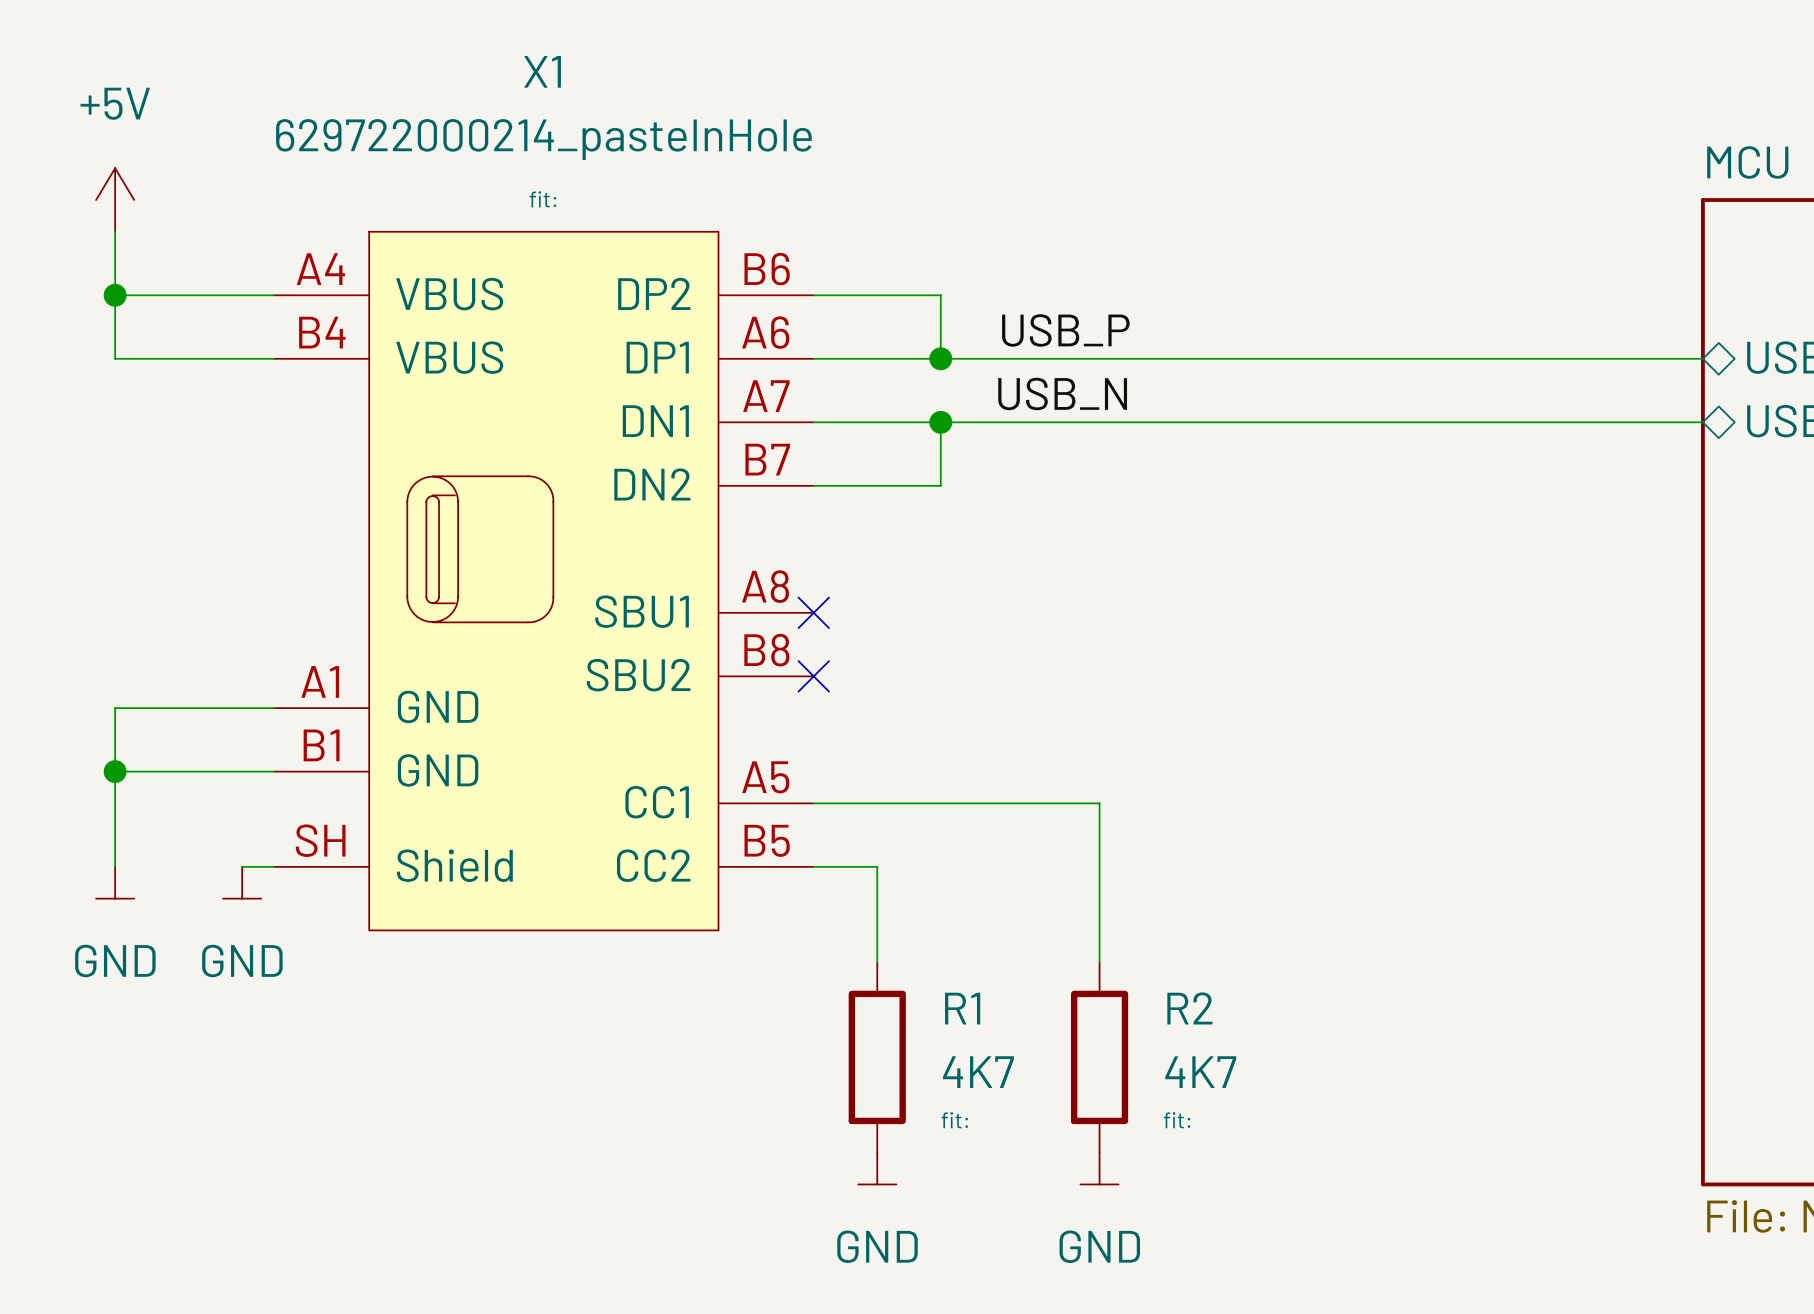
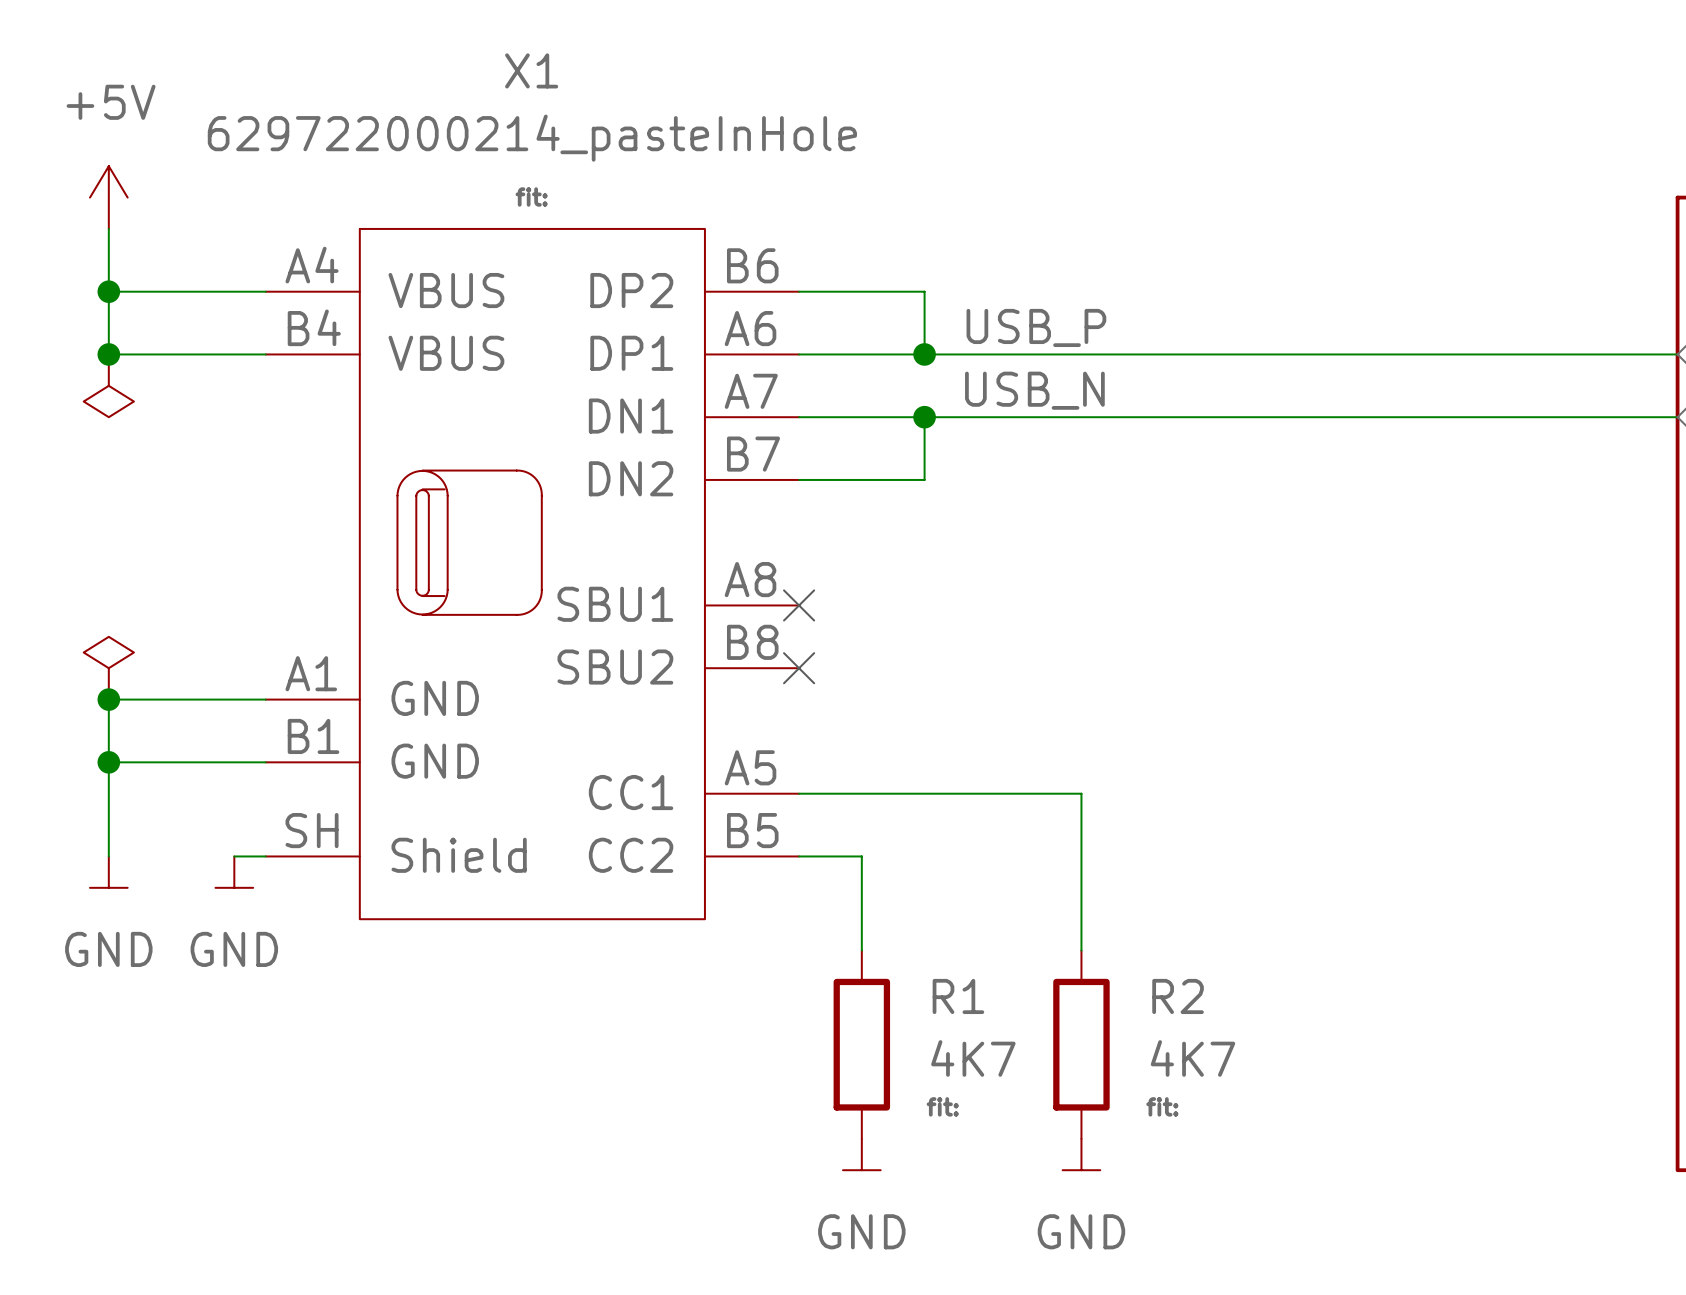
junction: none -> (108, 354)
power symbol: none -> (108, 385)
power symbol: none -> (108, 668)
junction: none -> (108, 699)

